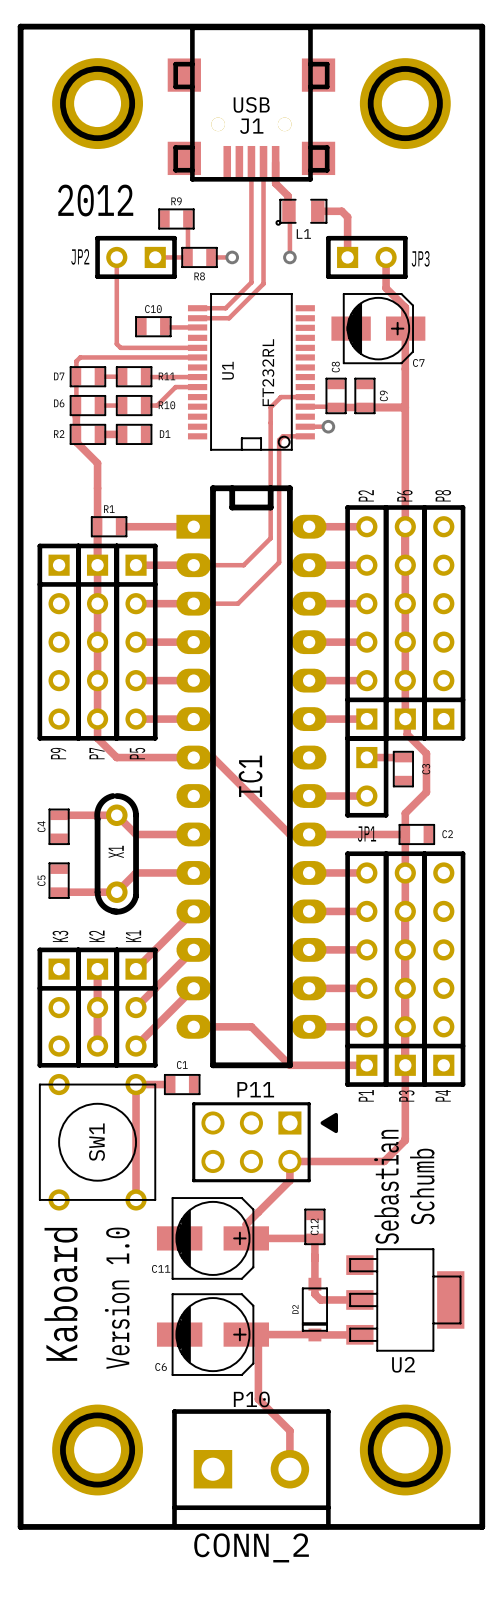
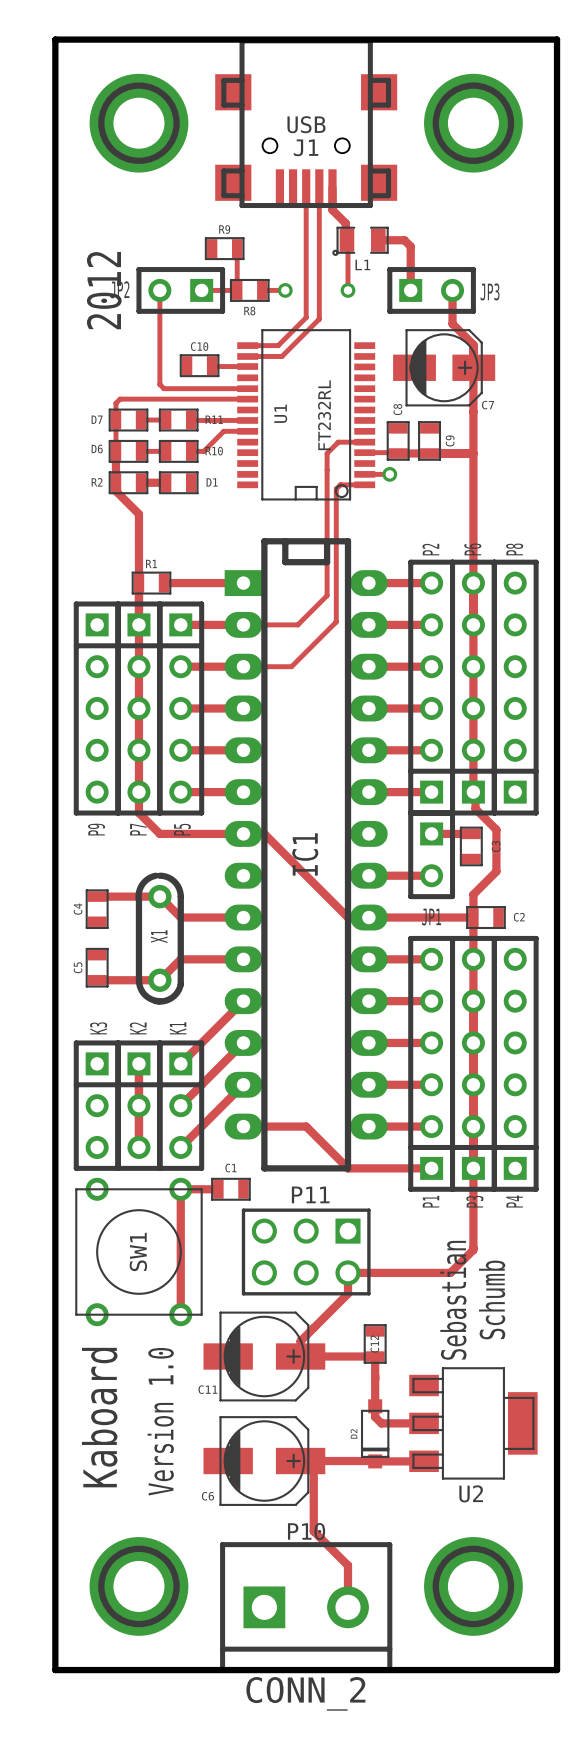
J1 footprint: [167, 25, 336, 182] -> [215, 38, 398, 209]
text rotation: 0° (95, 200) -> 90° counterclockwise (104, 290)
drawing: [320, 1112, 338, 1134] -> none

